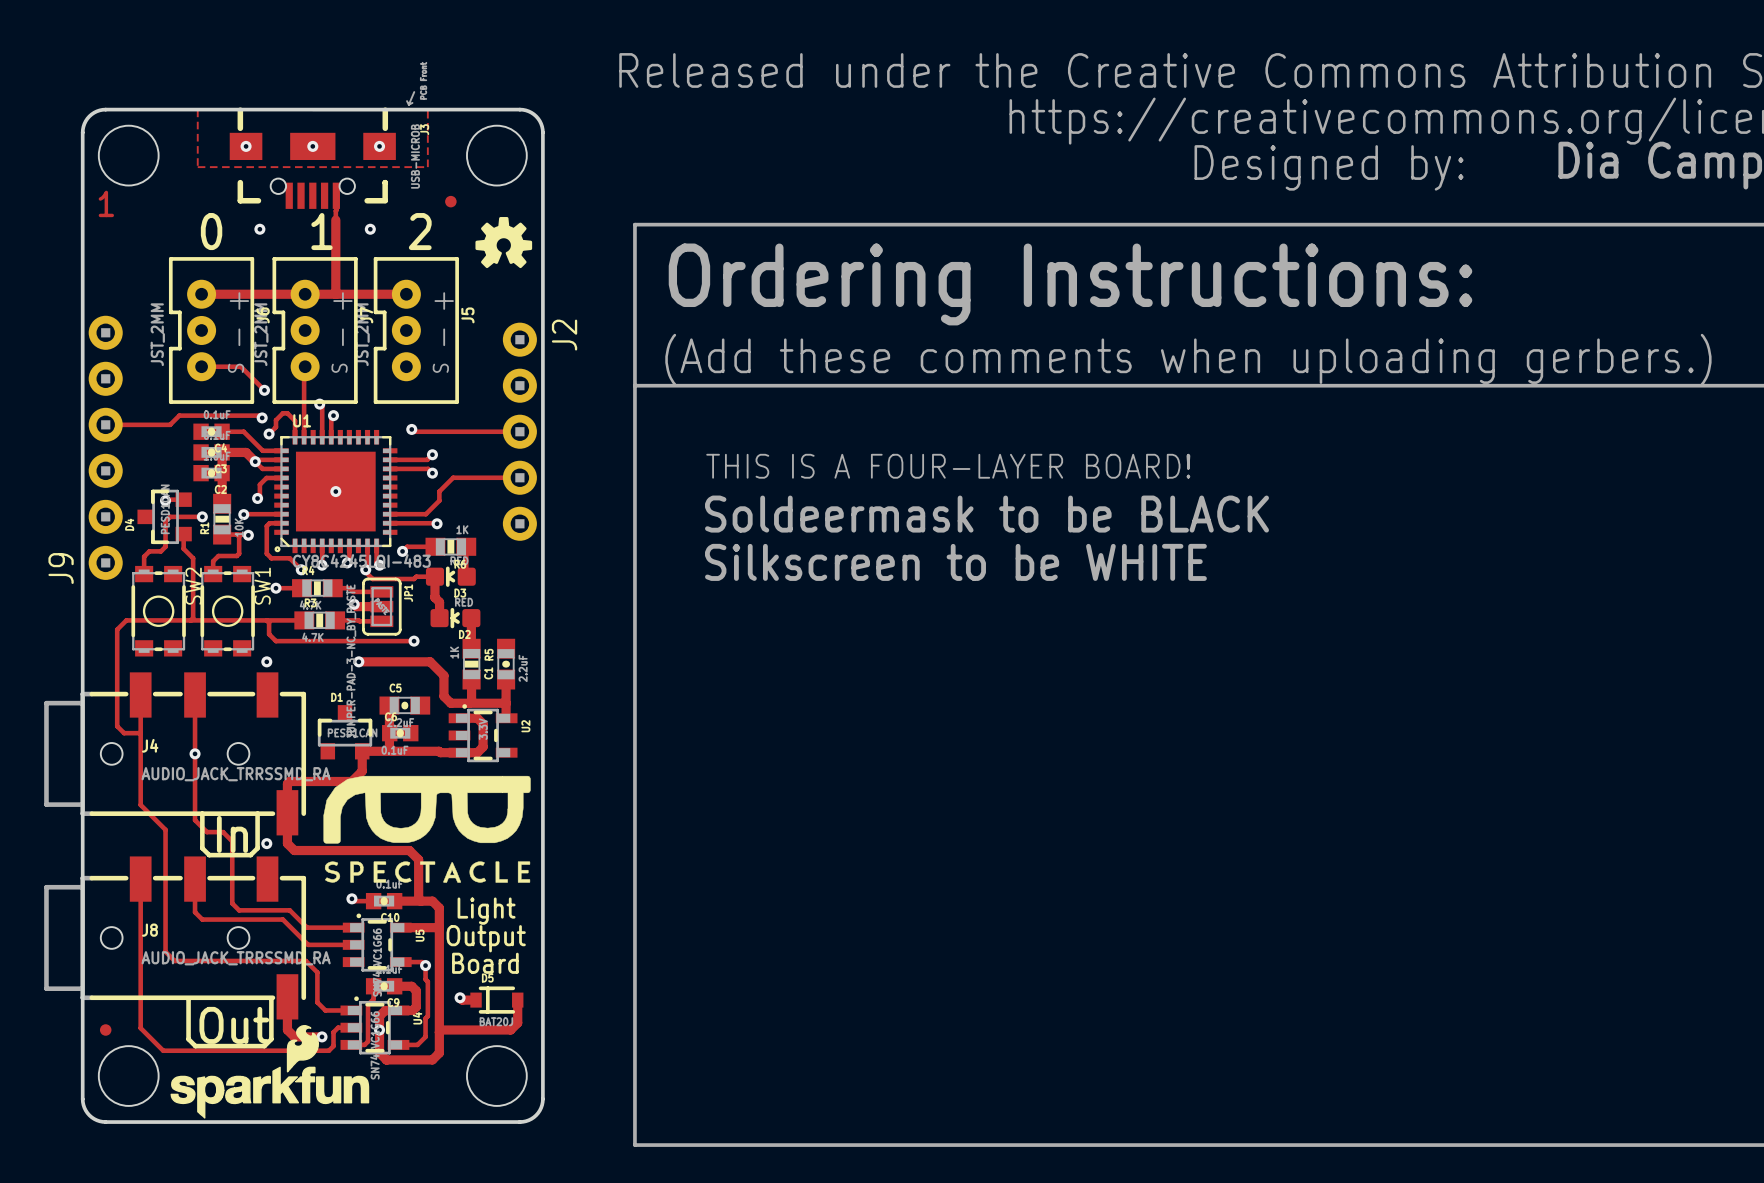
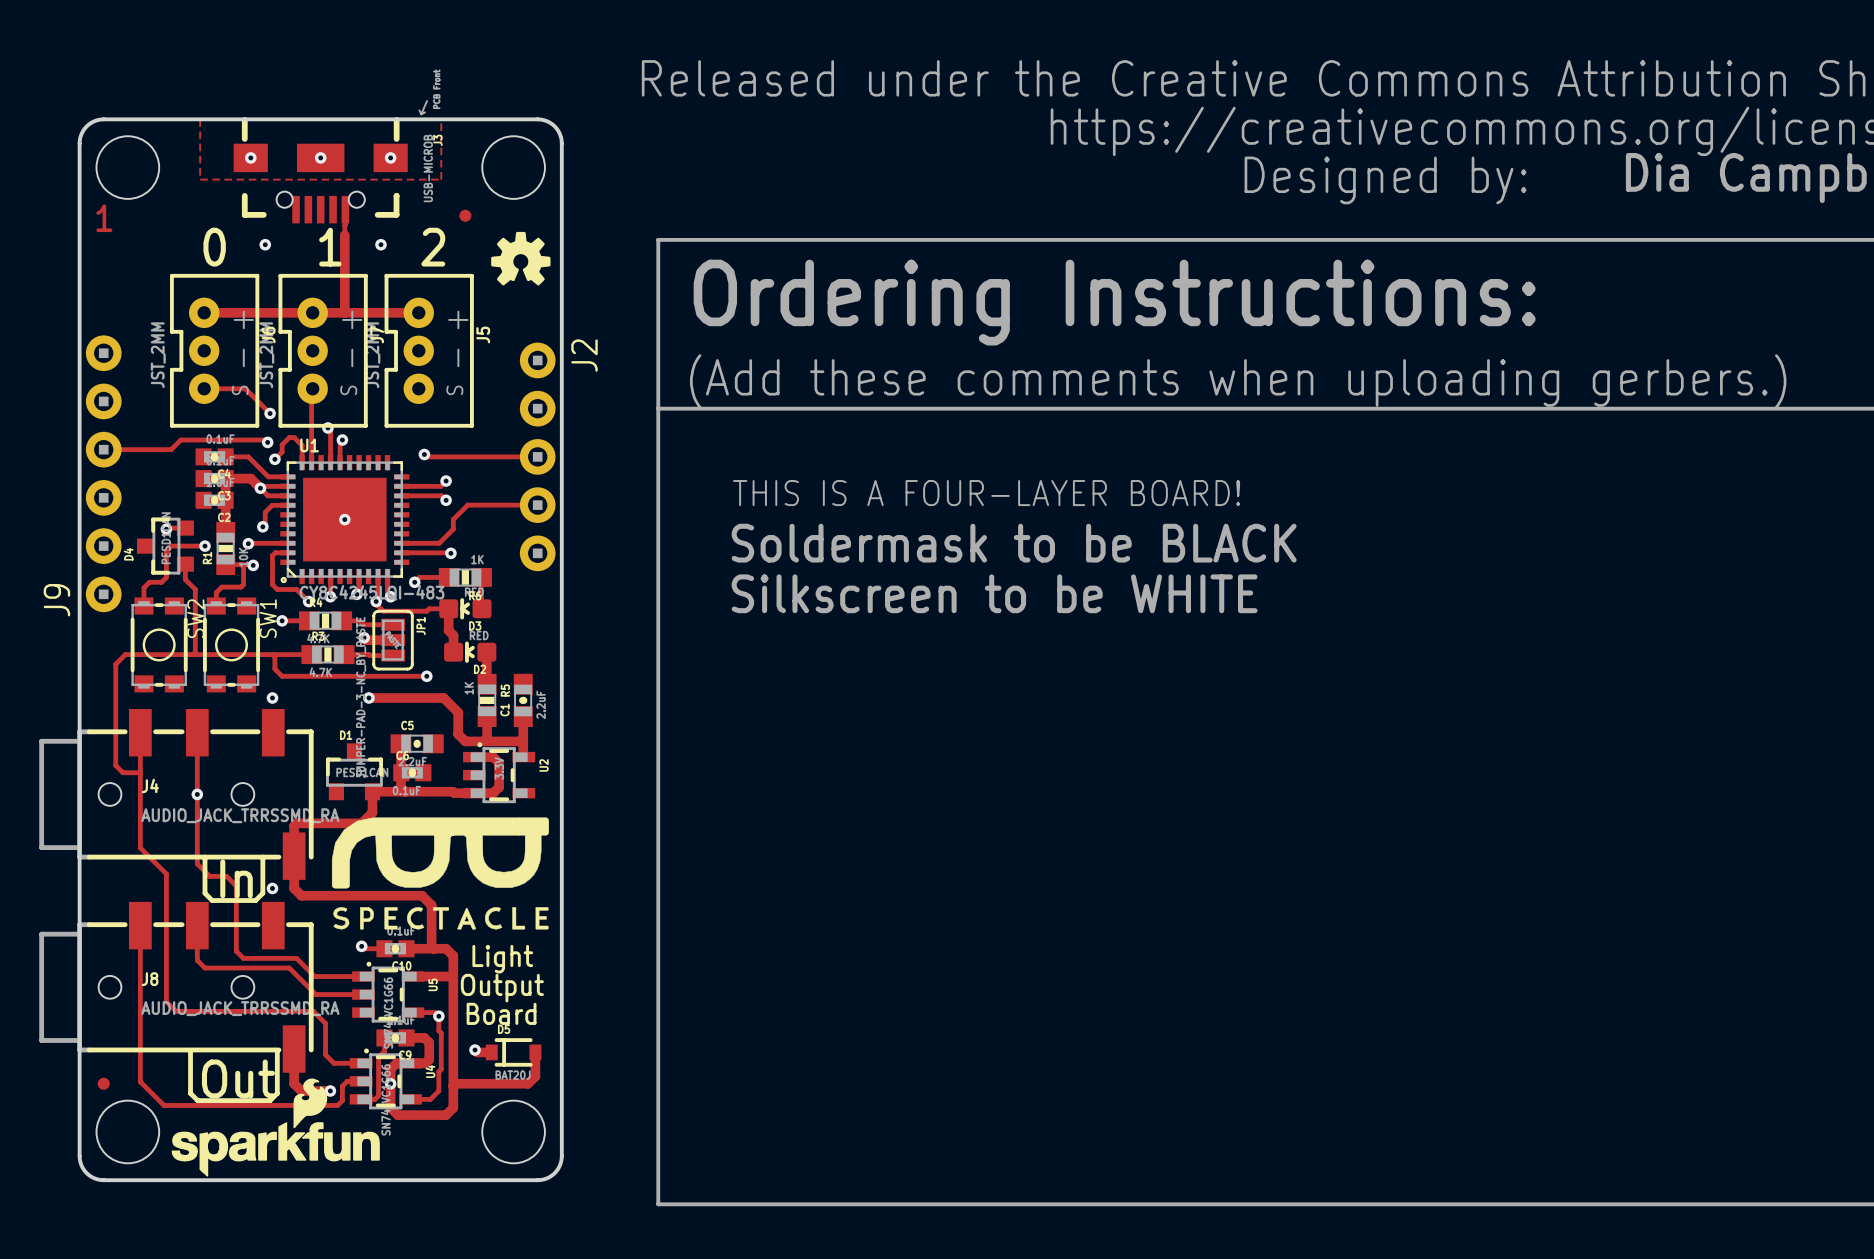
text: Soldeermask to be BLACK (987, 514) -> Soldermask to be BLACK (1014, 543)

